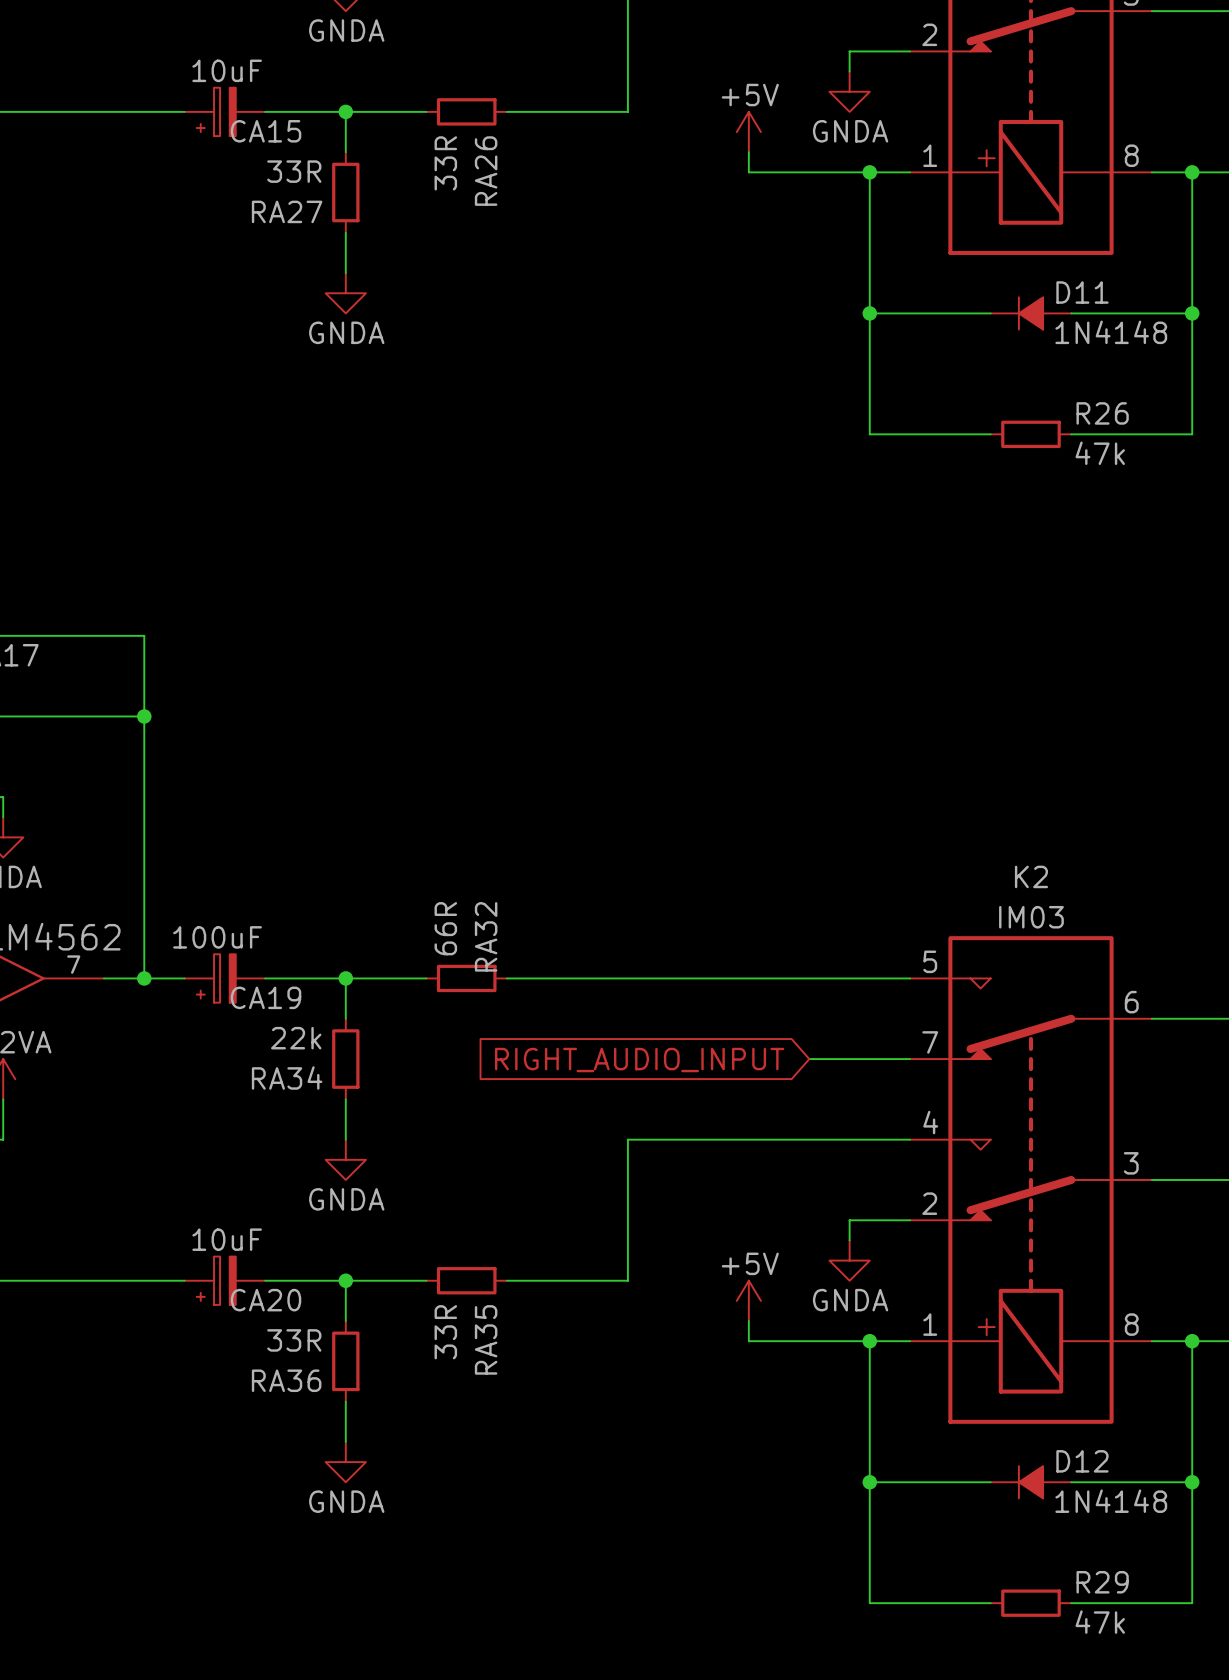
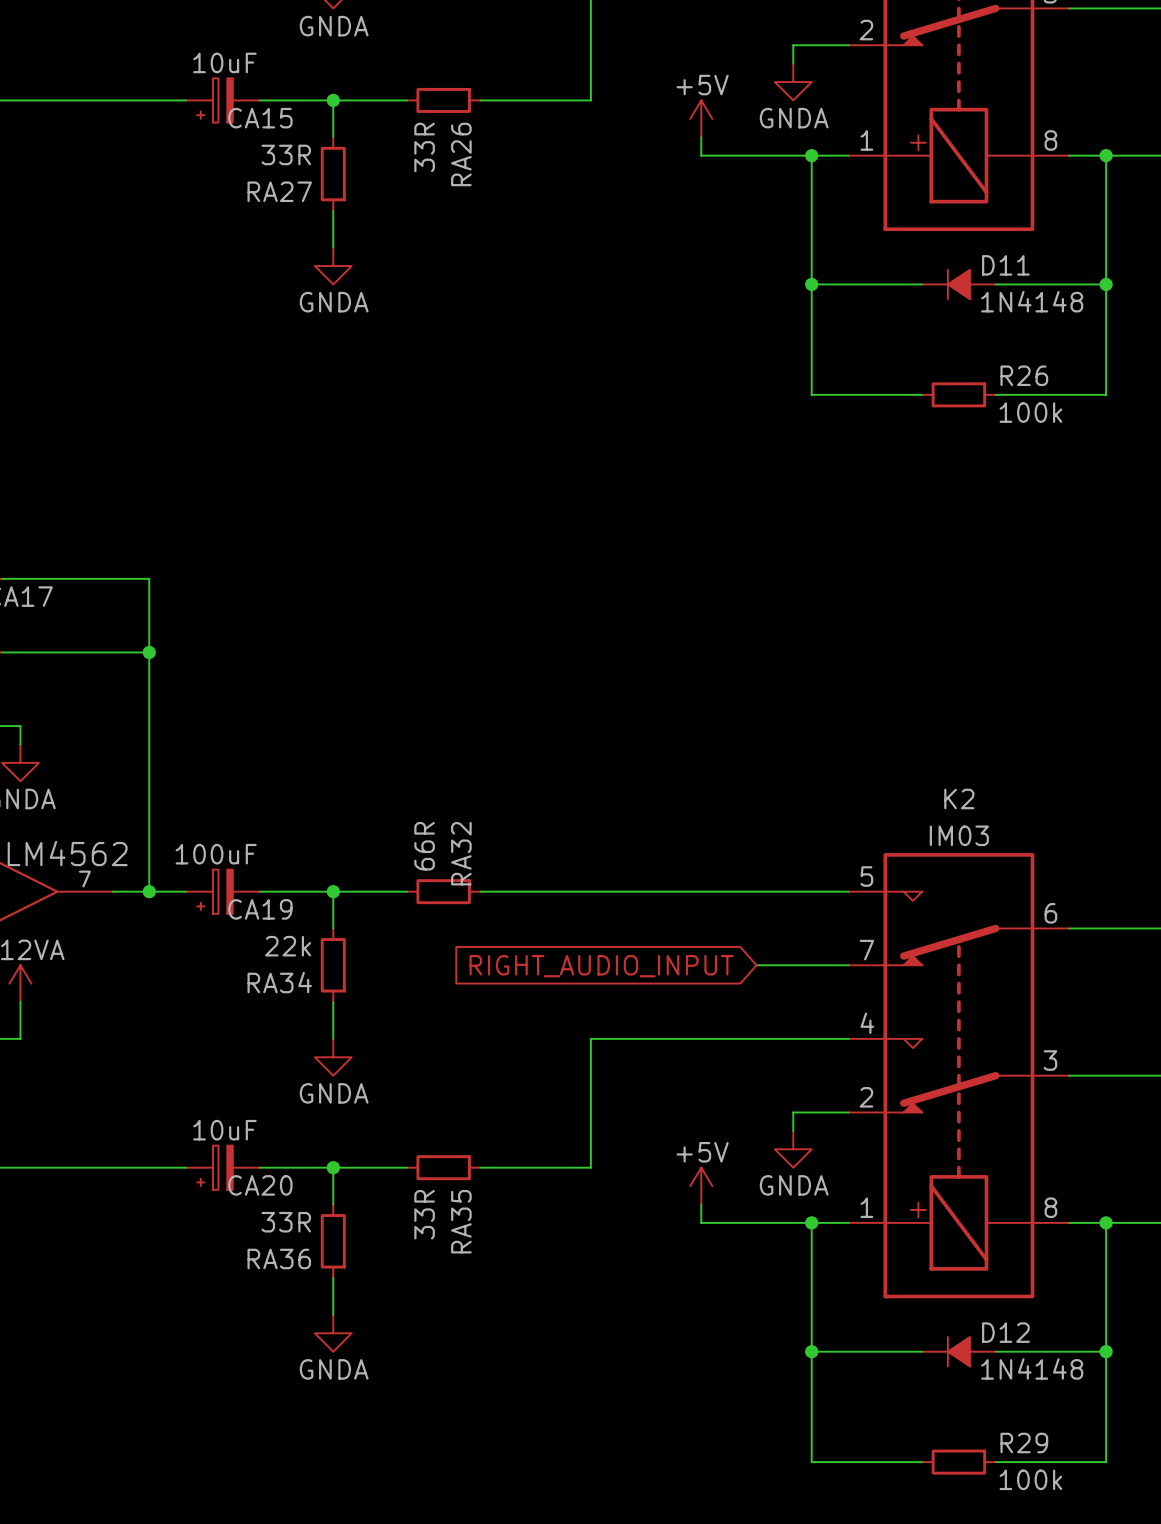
R26 value: 47k (1100, 453) -> 100k (1030, 412)
R29 value: 47k (1100, 1622) -> 100k (1030, 1479)

